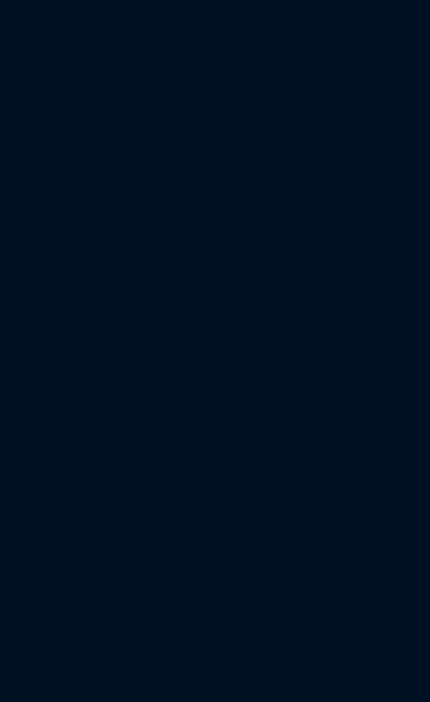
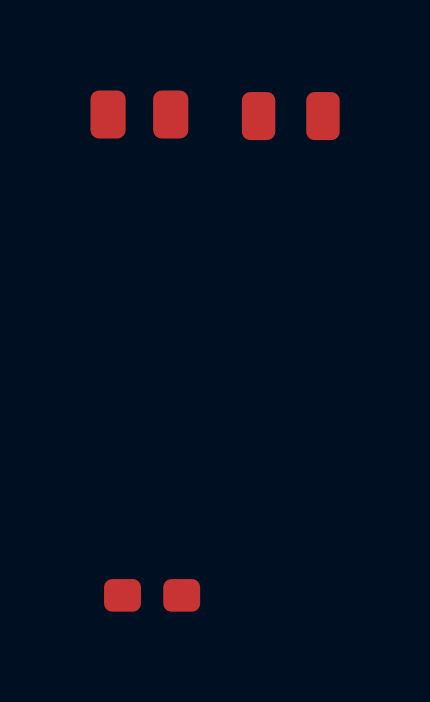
part: none -> (139, 114)
part: none -> (290, 116)
part: none -> (152, 595)

